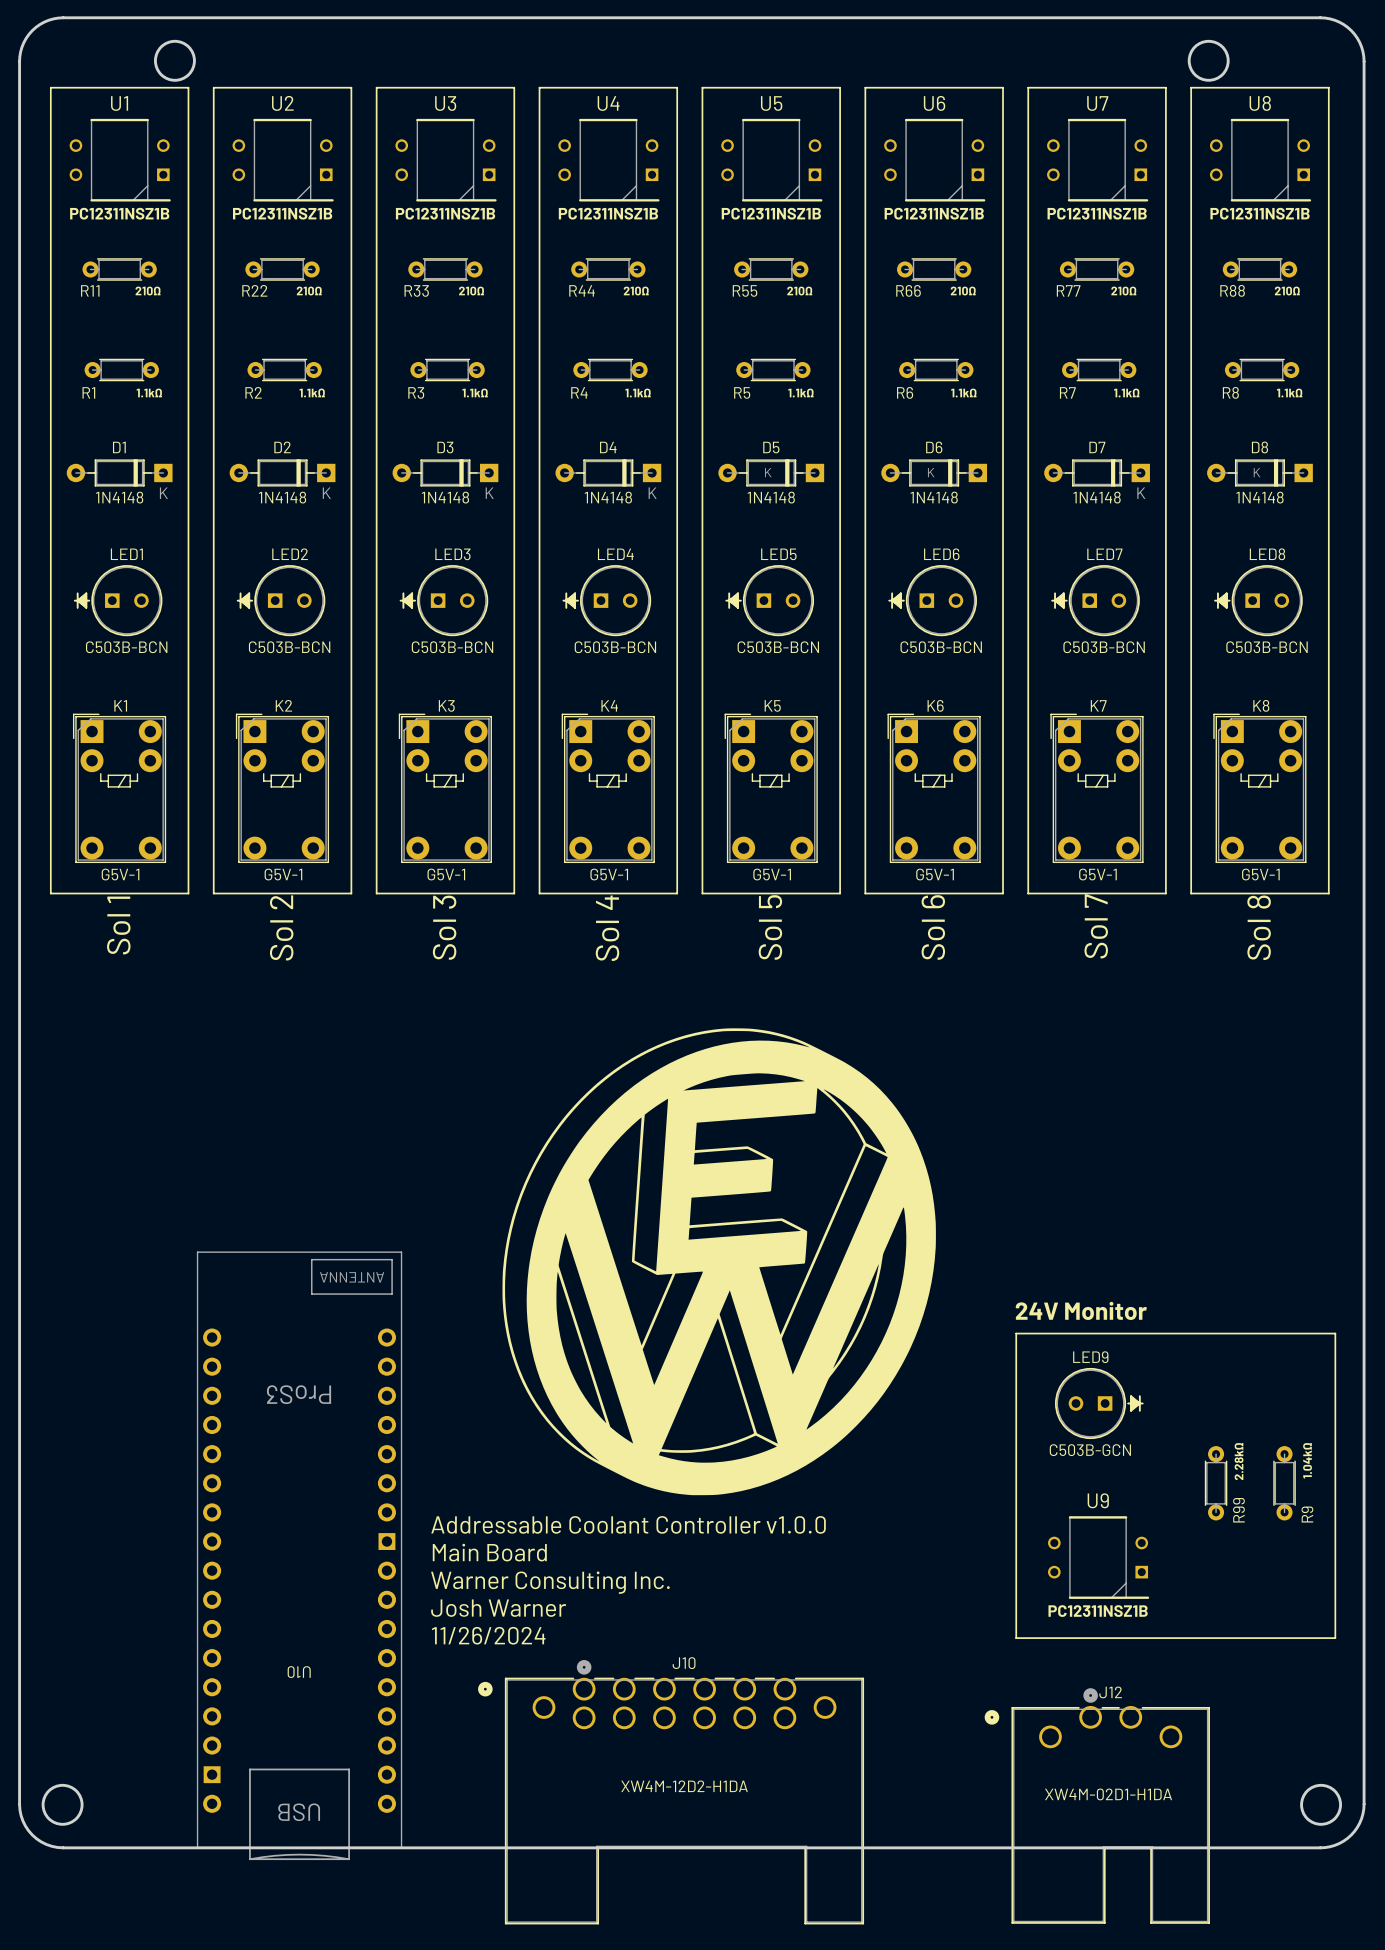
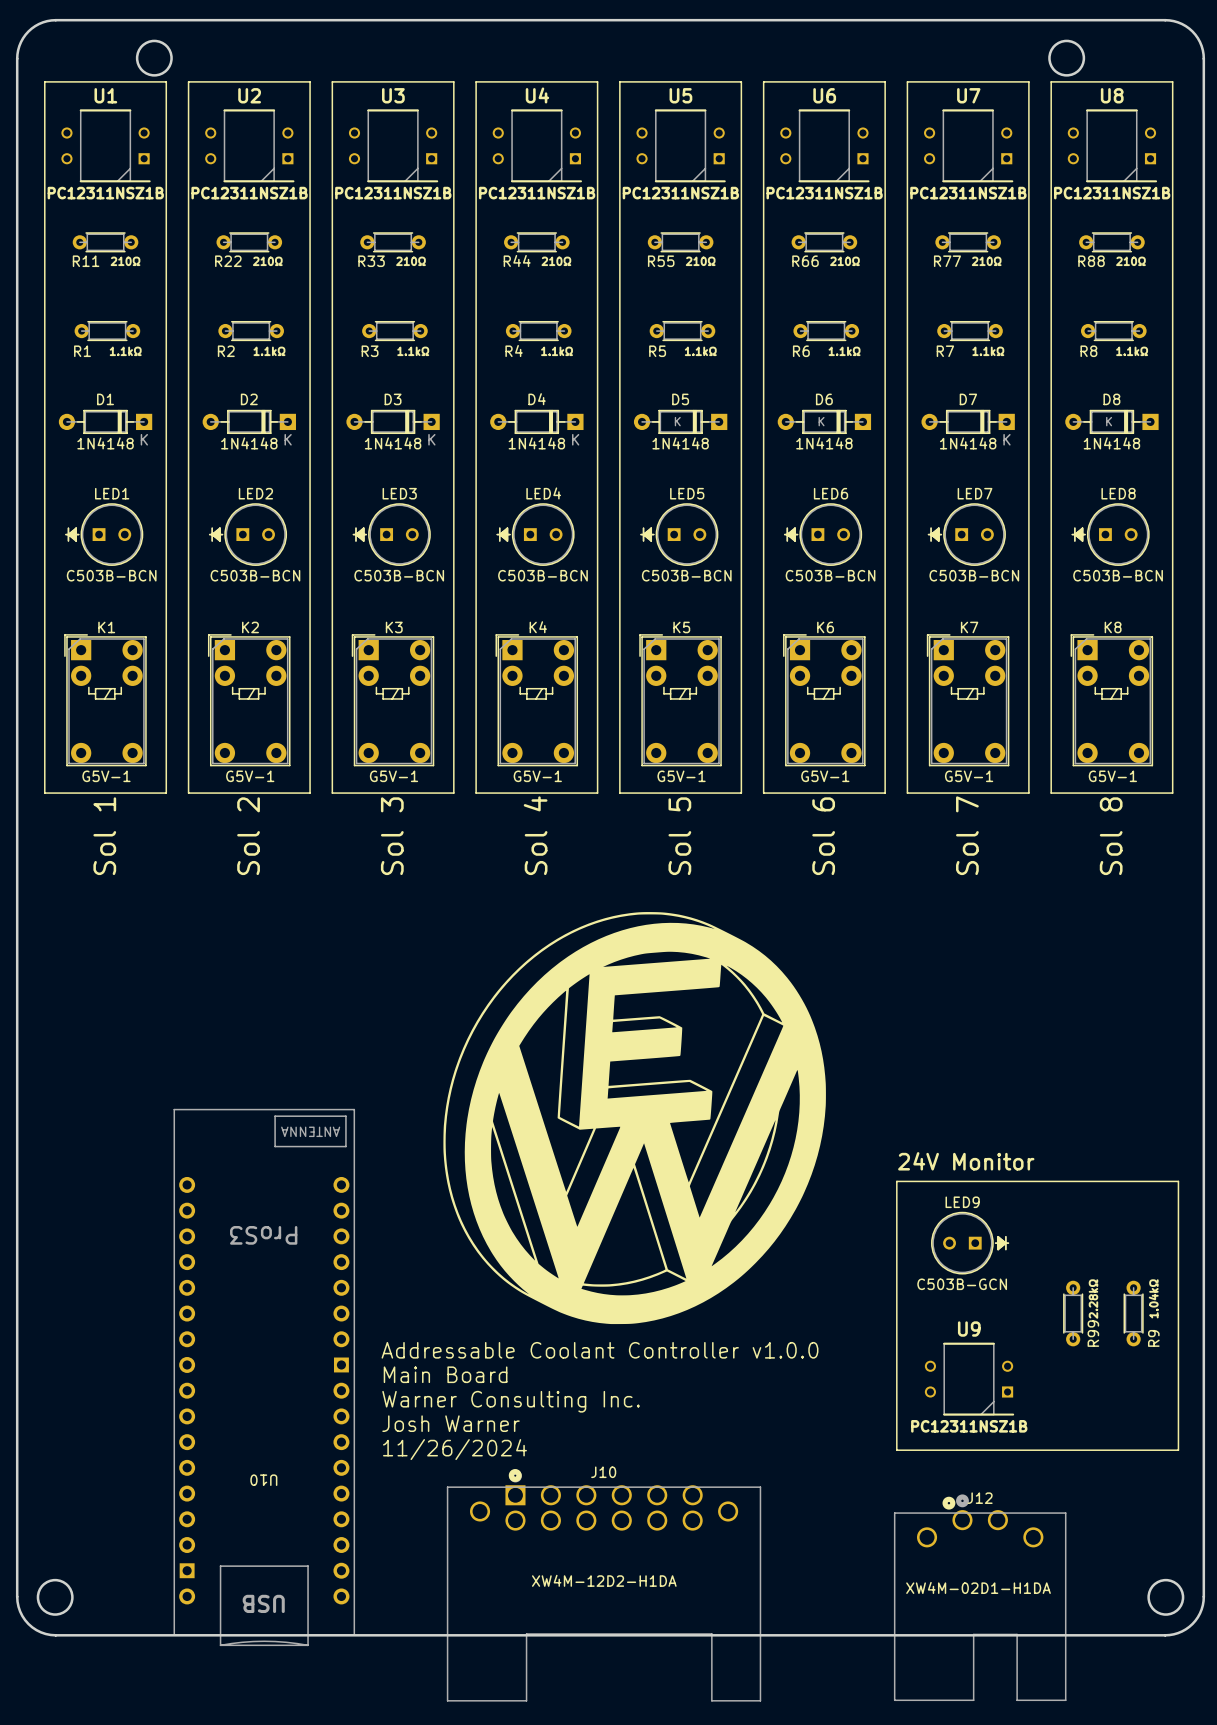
J10 footprint: [478, 1660, 865, 1925] -> [447, 1469, 761, 1701]
J12 footprint: [984, 1688, 1210, 1924] -> [894, 1494, 1066, 1701]

